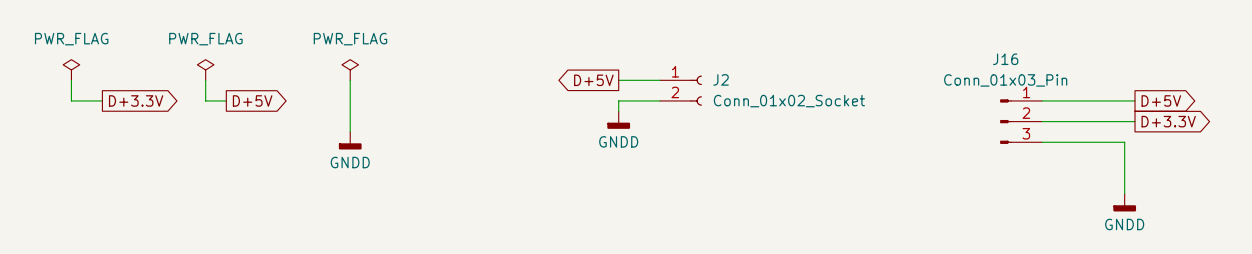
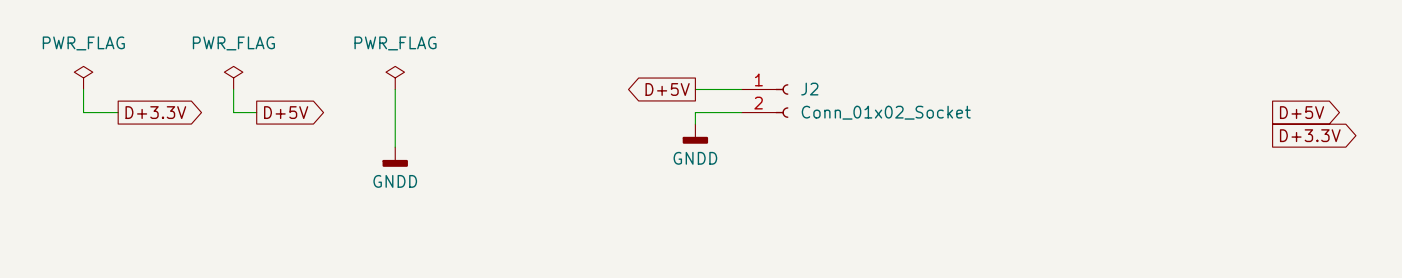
wire: (1042, 100) (1135, 100) -> none
J16: Conn_01x03_Pin (1021, 121) -> none
wire: (1042, 121) (1135, 121) -> none
wire: (1042, 142) (1124, 142) (1124, 193) -> none
power symbol: GNDD (1124, 202) -> none

